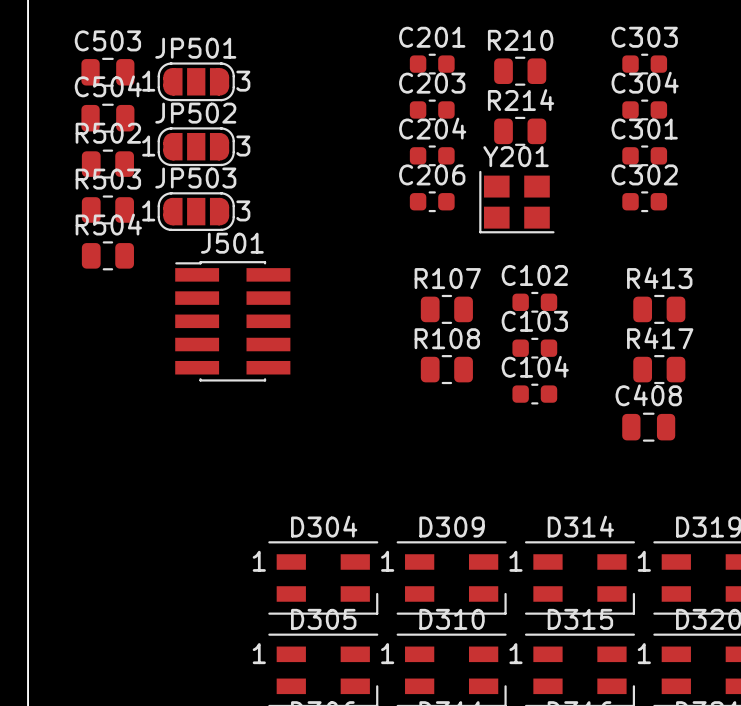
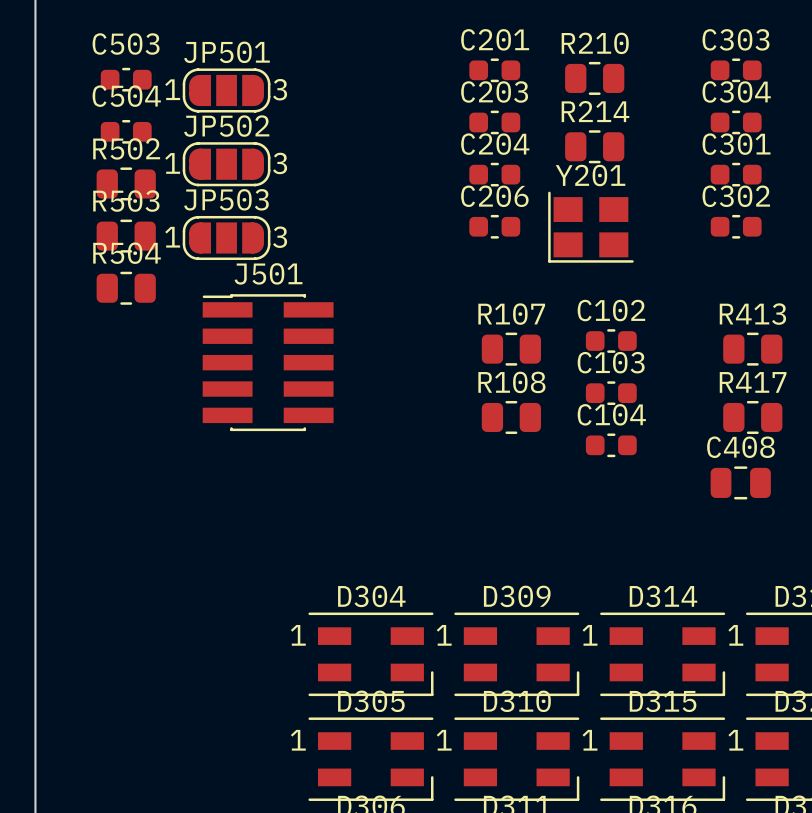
C503 footprint: [81, 57, 135, 87] -> [100, 67, 152, 92]
C504 footprint: [81, 103, 135, 133] -> [100, 119, 152, 144]

